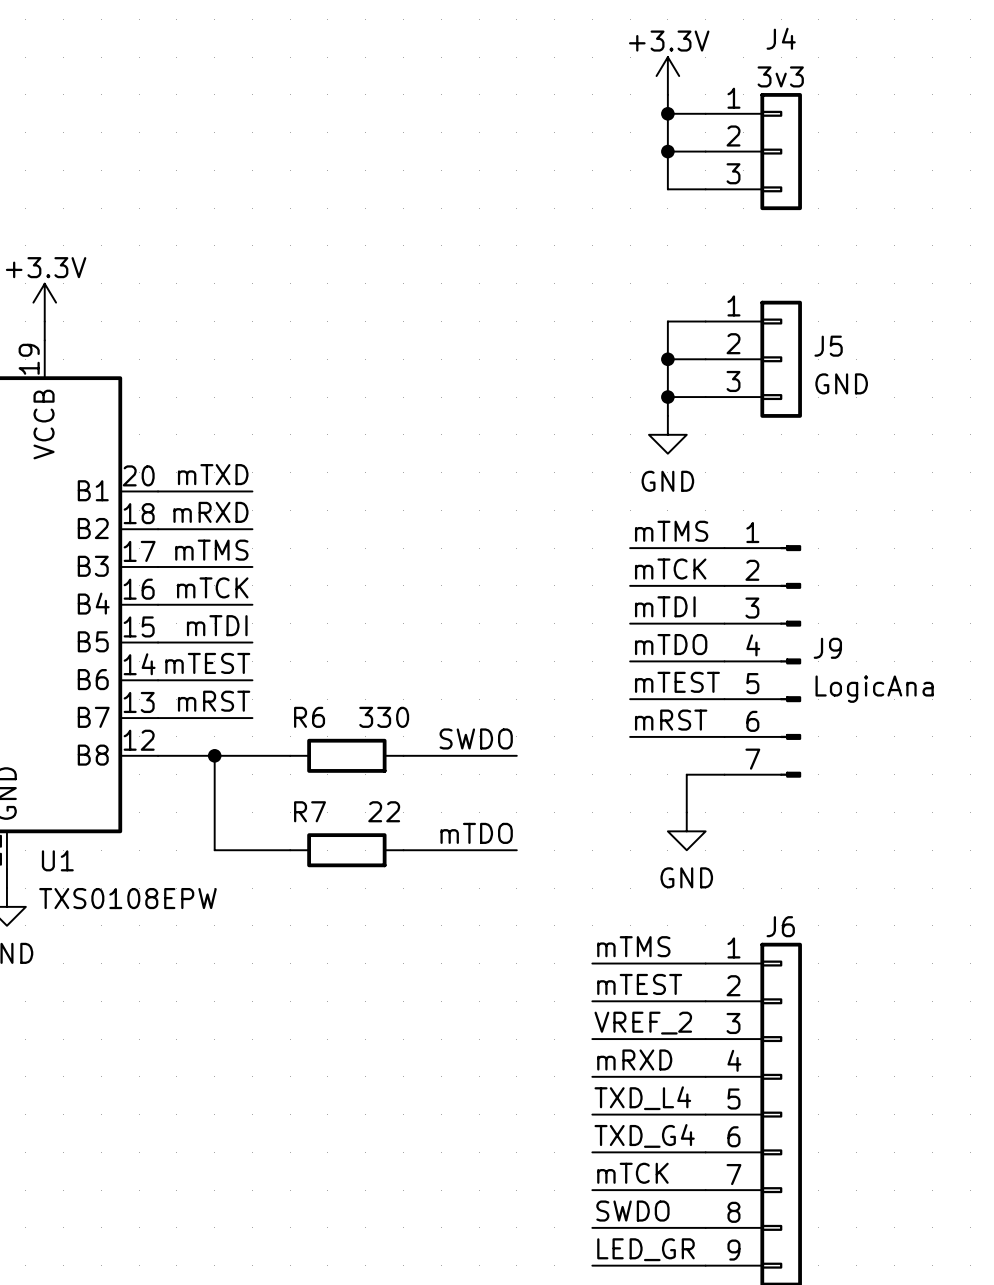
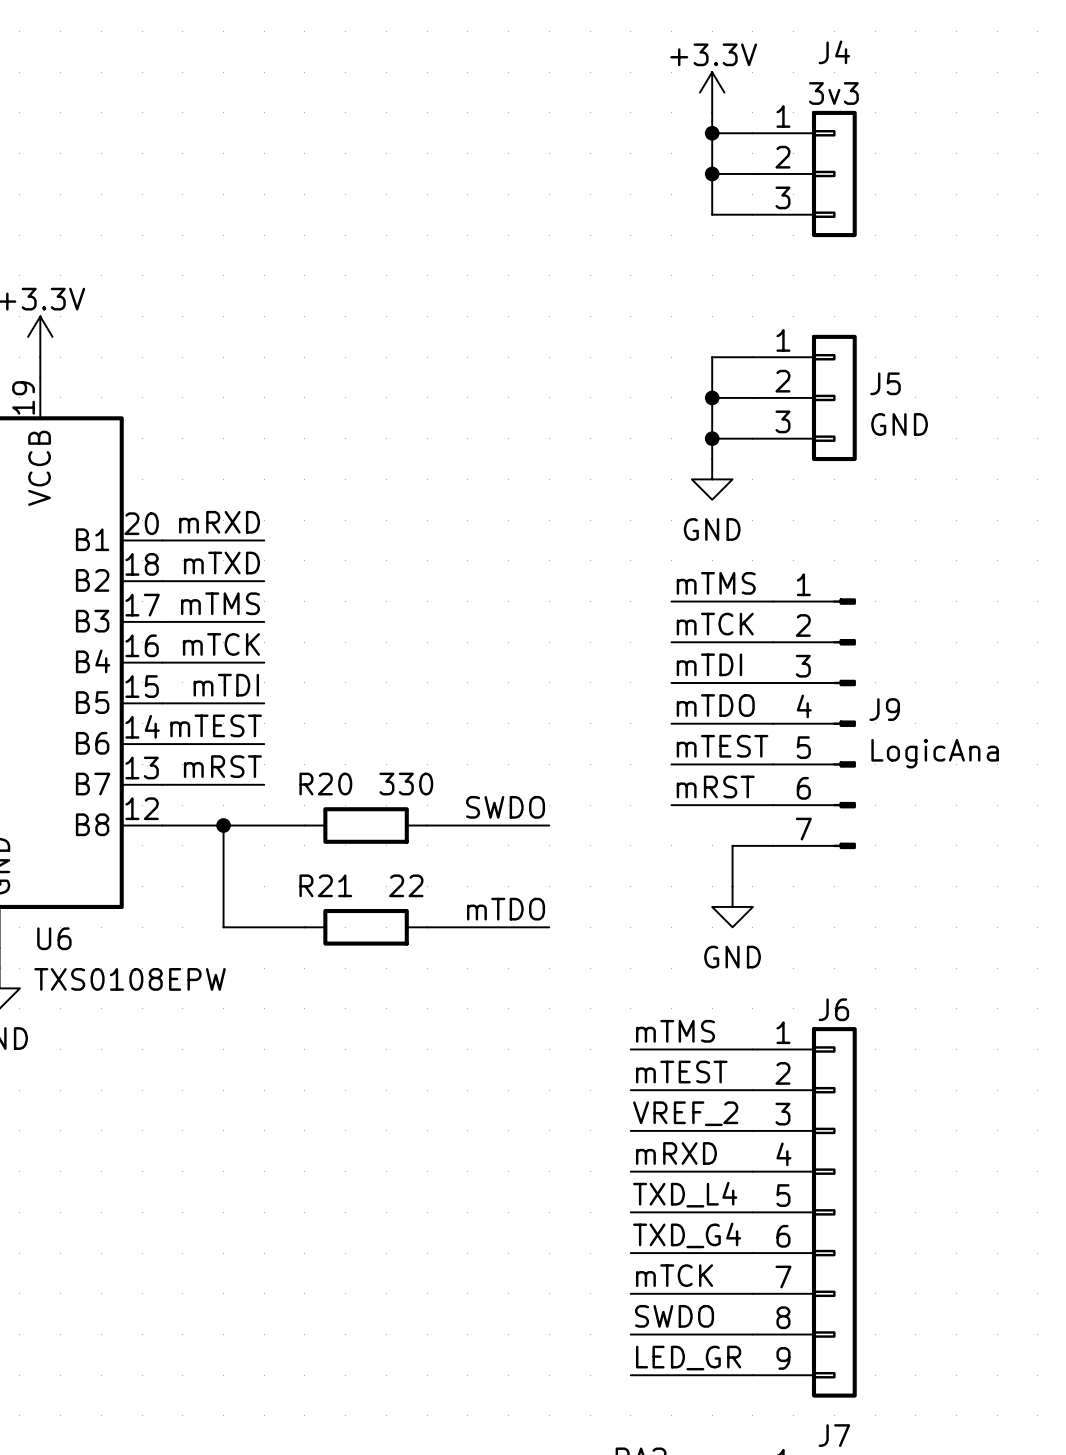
label: mTXD (213, 474) -> mRXD (219, 522)
label: mRXD (210, 512) -> mTXD (221, 563)
R6 name: R6 (309, 717) -> R20 (325, 784)
R7 name: R7 (310, 811) -> R21 (325, 885)
U1 name: U1 (57, 860) -> U6 (54, 938)

